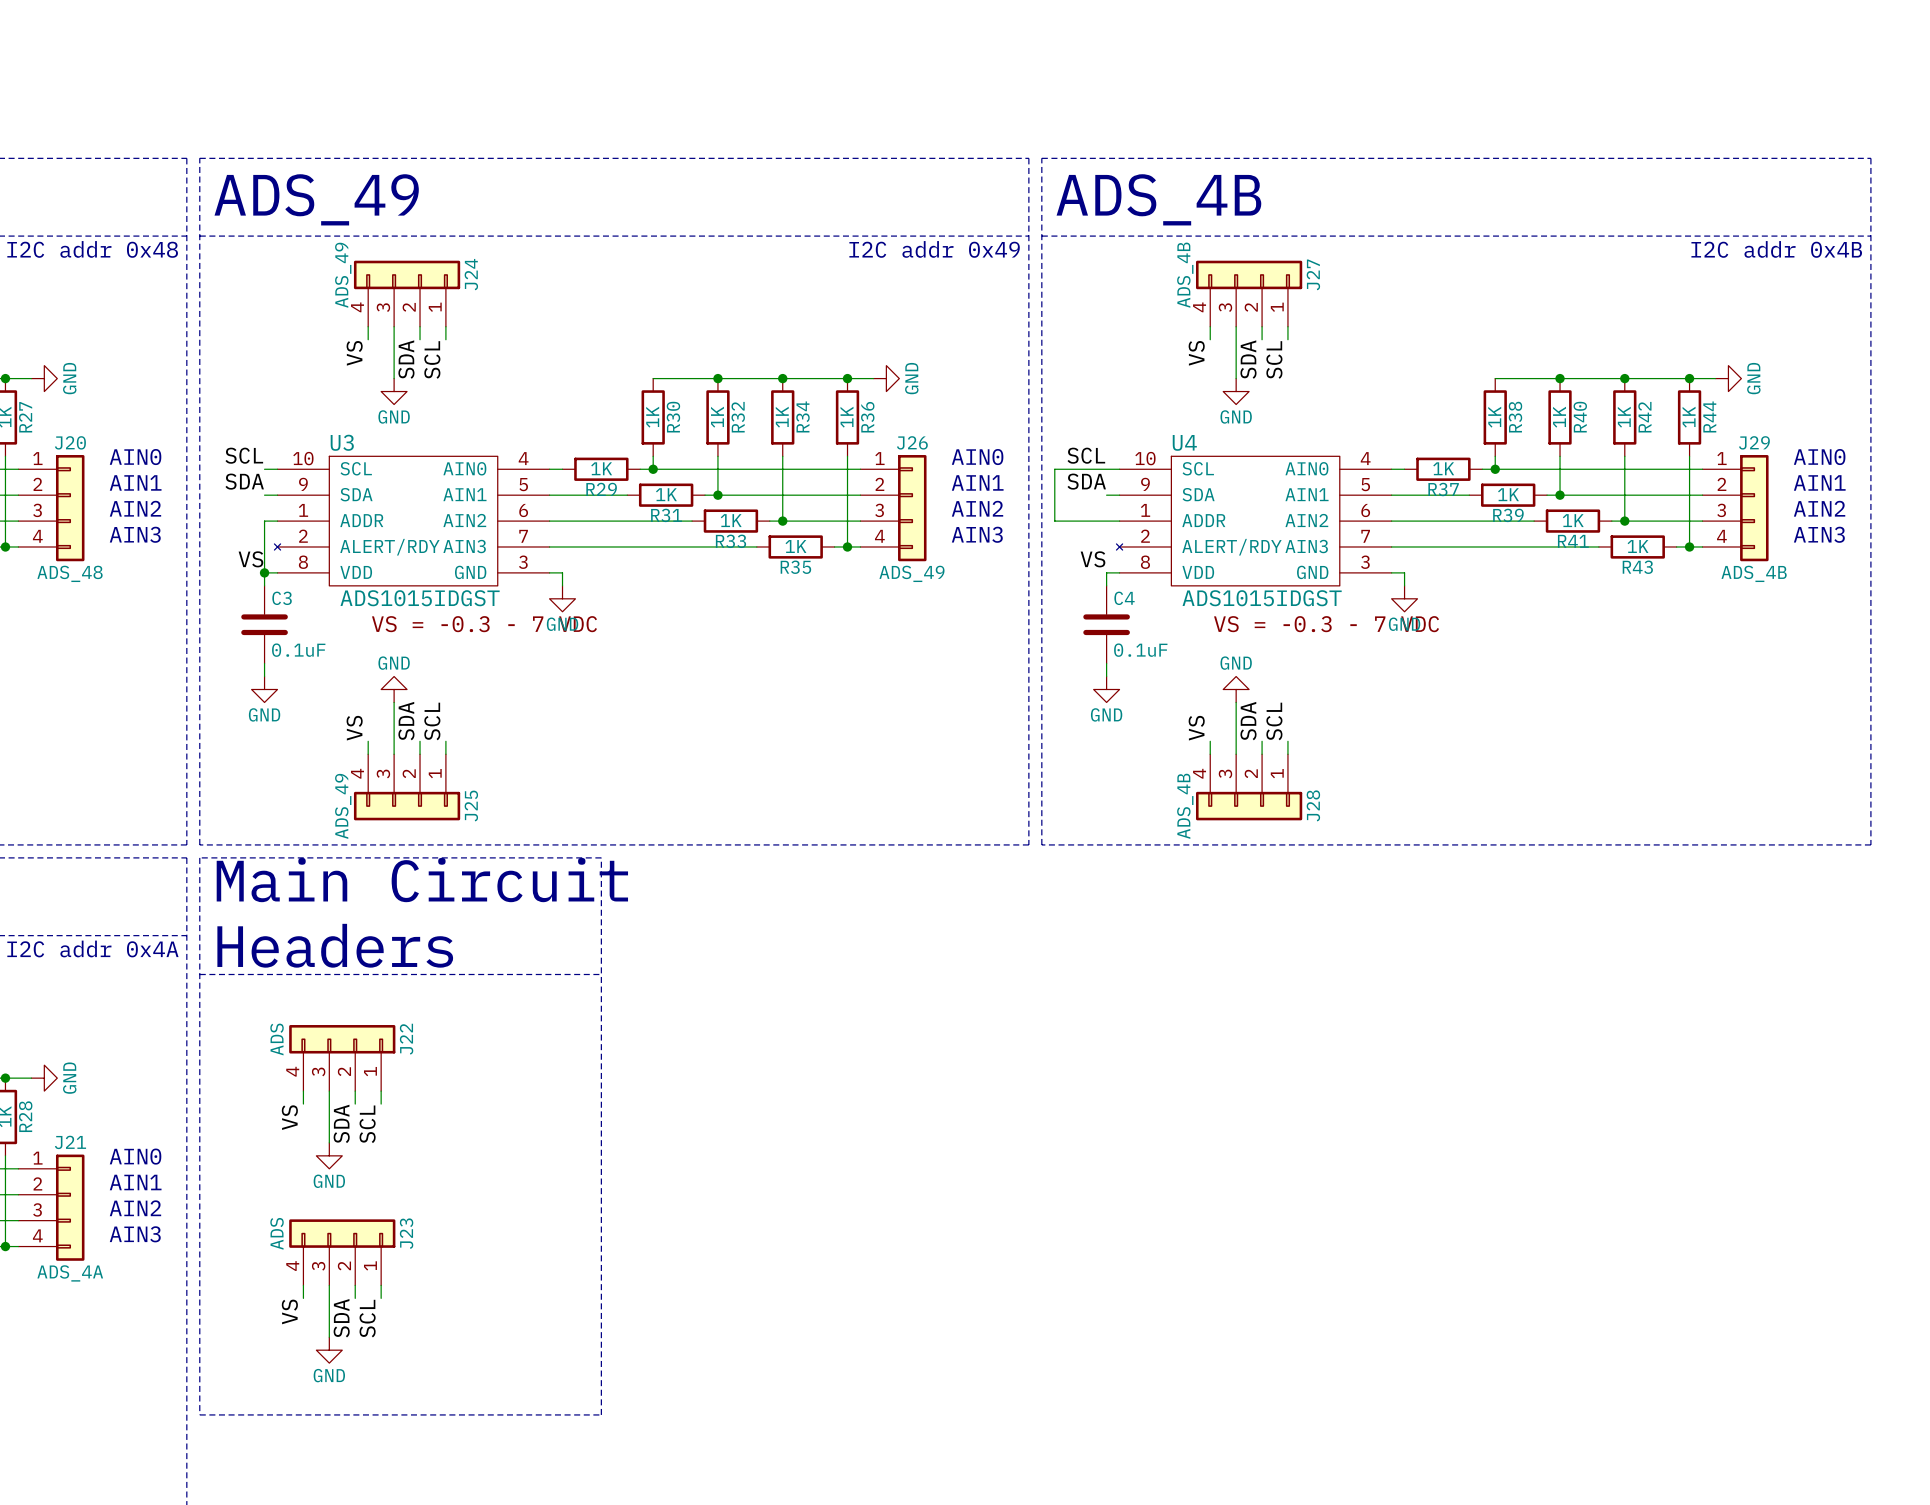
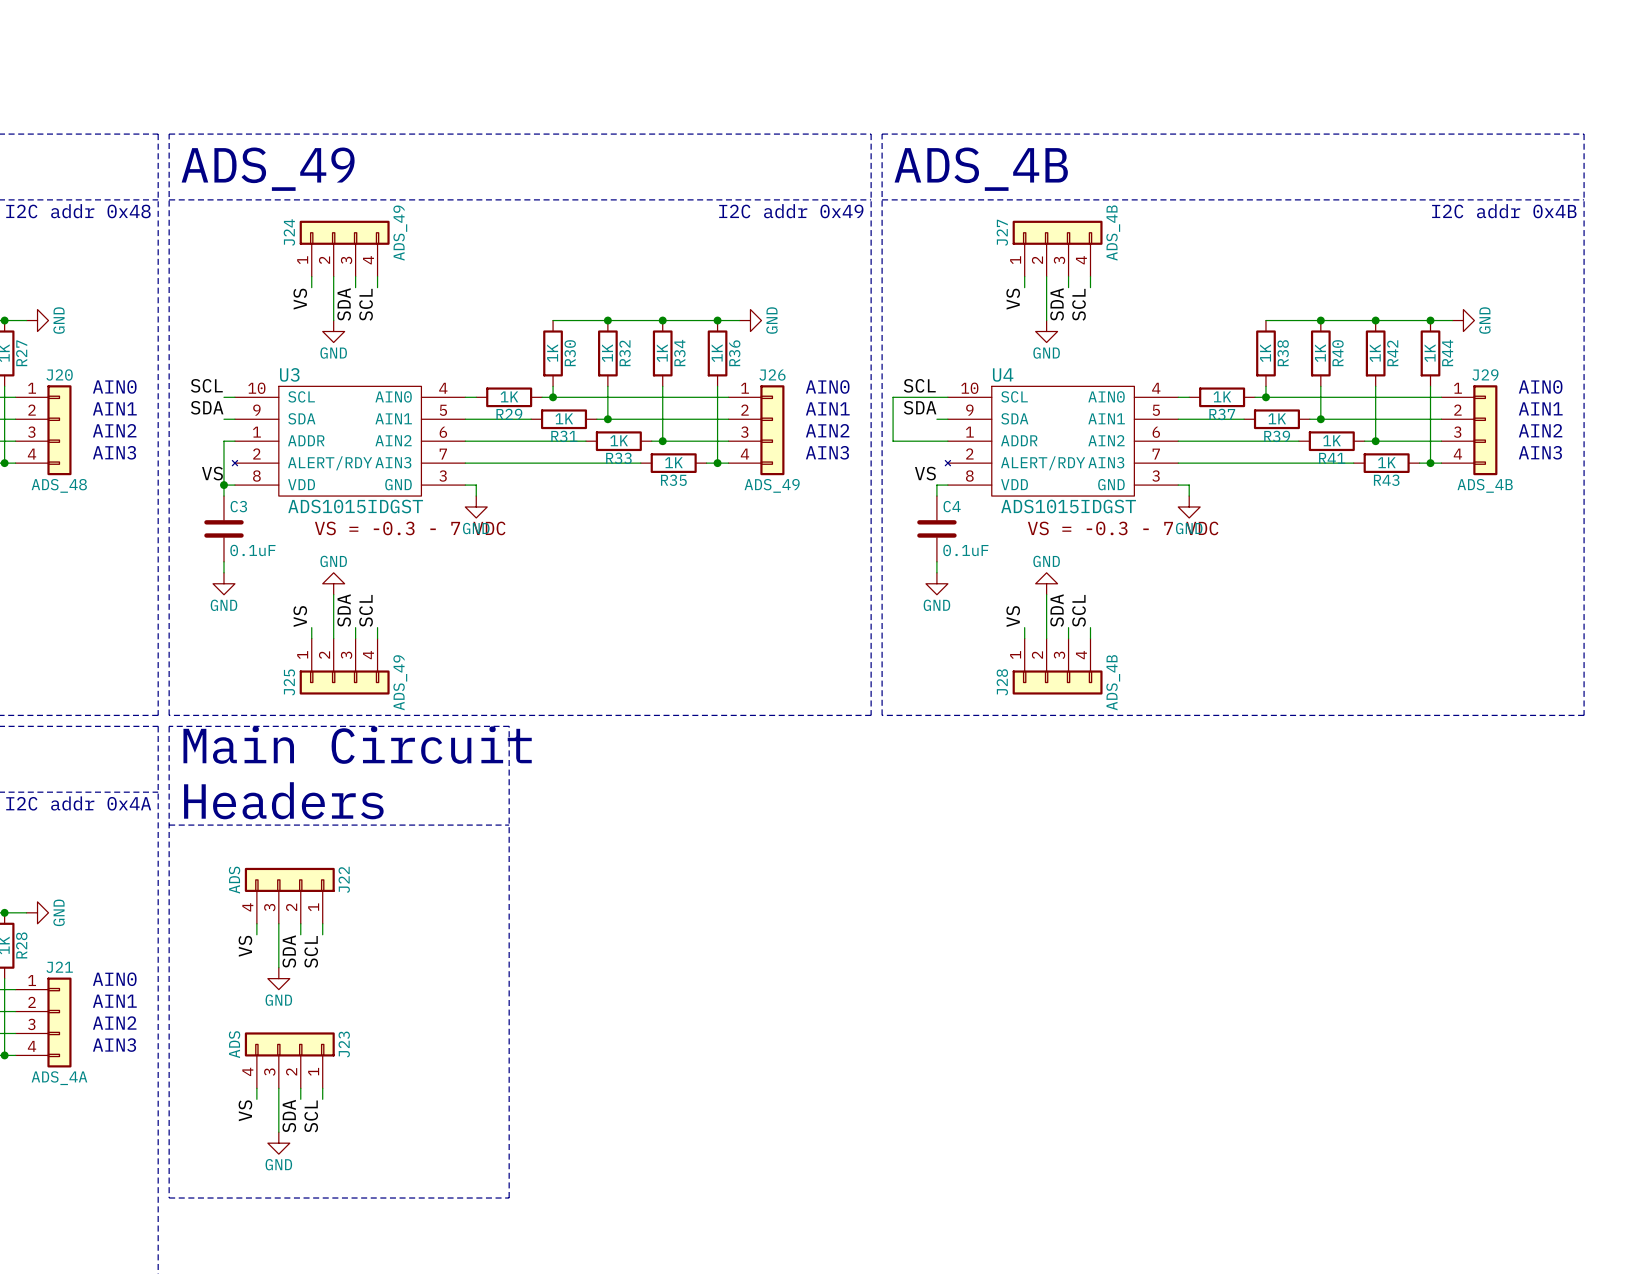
J24 flip: as is (407, 274) -> left-right (344, 232)
J27 flip: as is (1249, 274) -> left-right (1057, 232)
J25 flip: as is (407, 806) -> left-right (344, 682)
J28 flip: as is (1249, 806) -> left-right (1057, 682)

